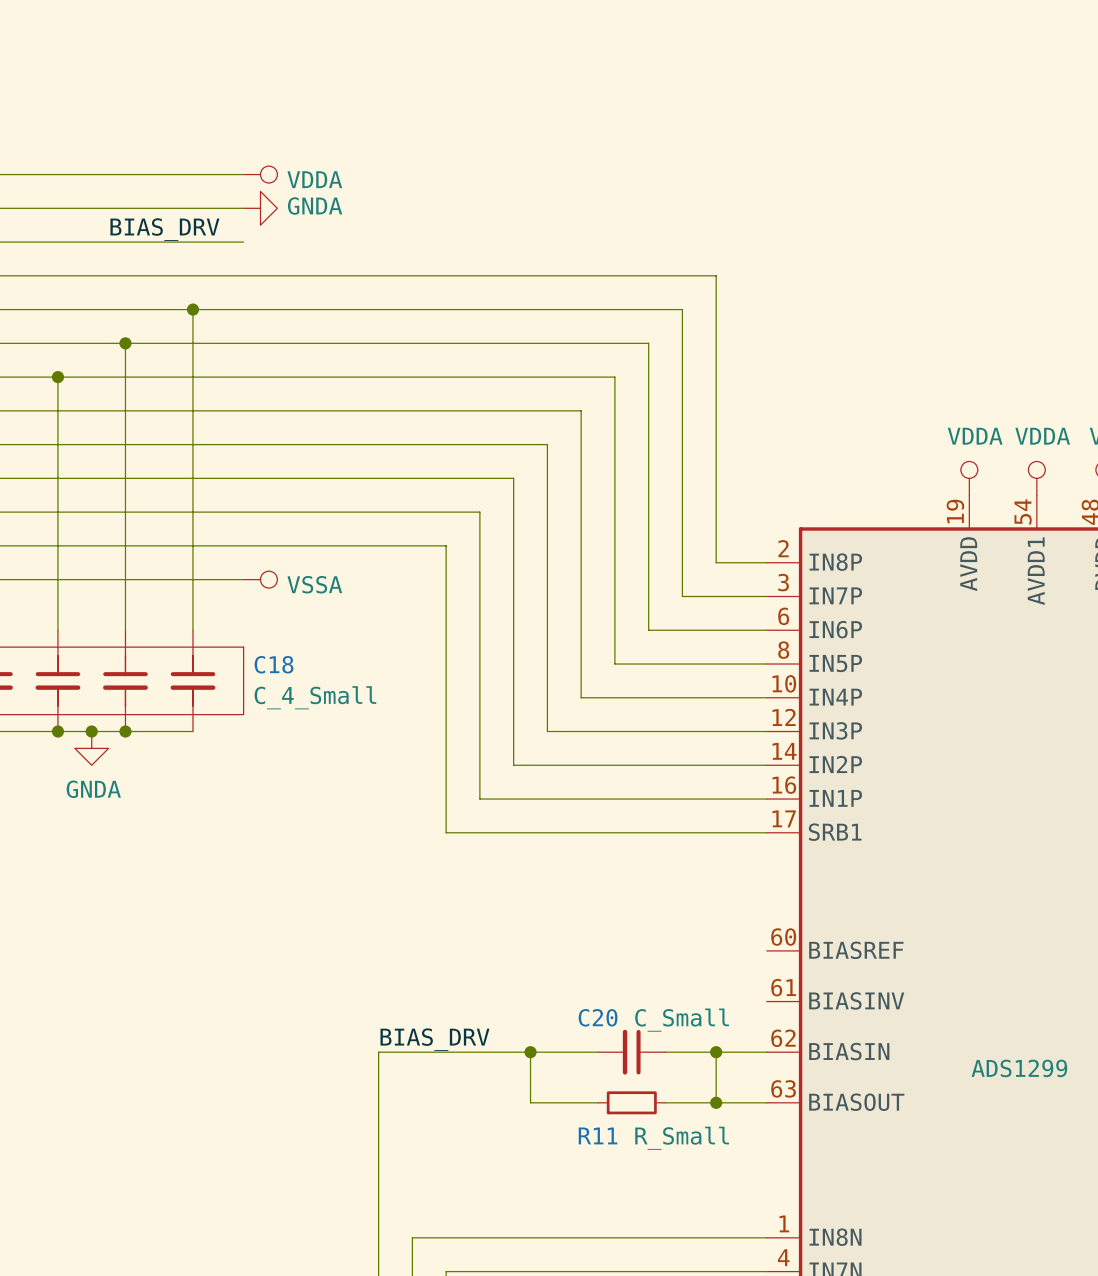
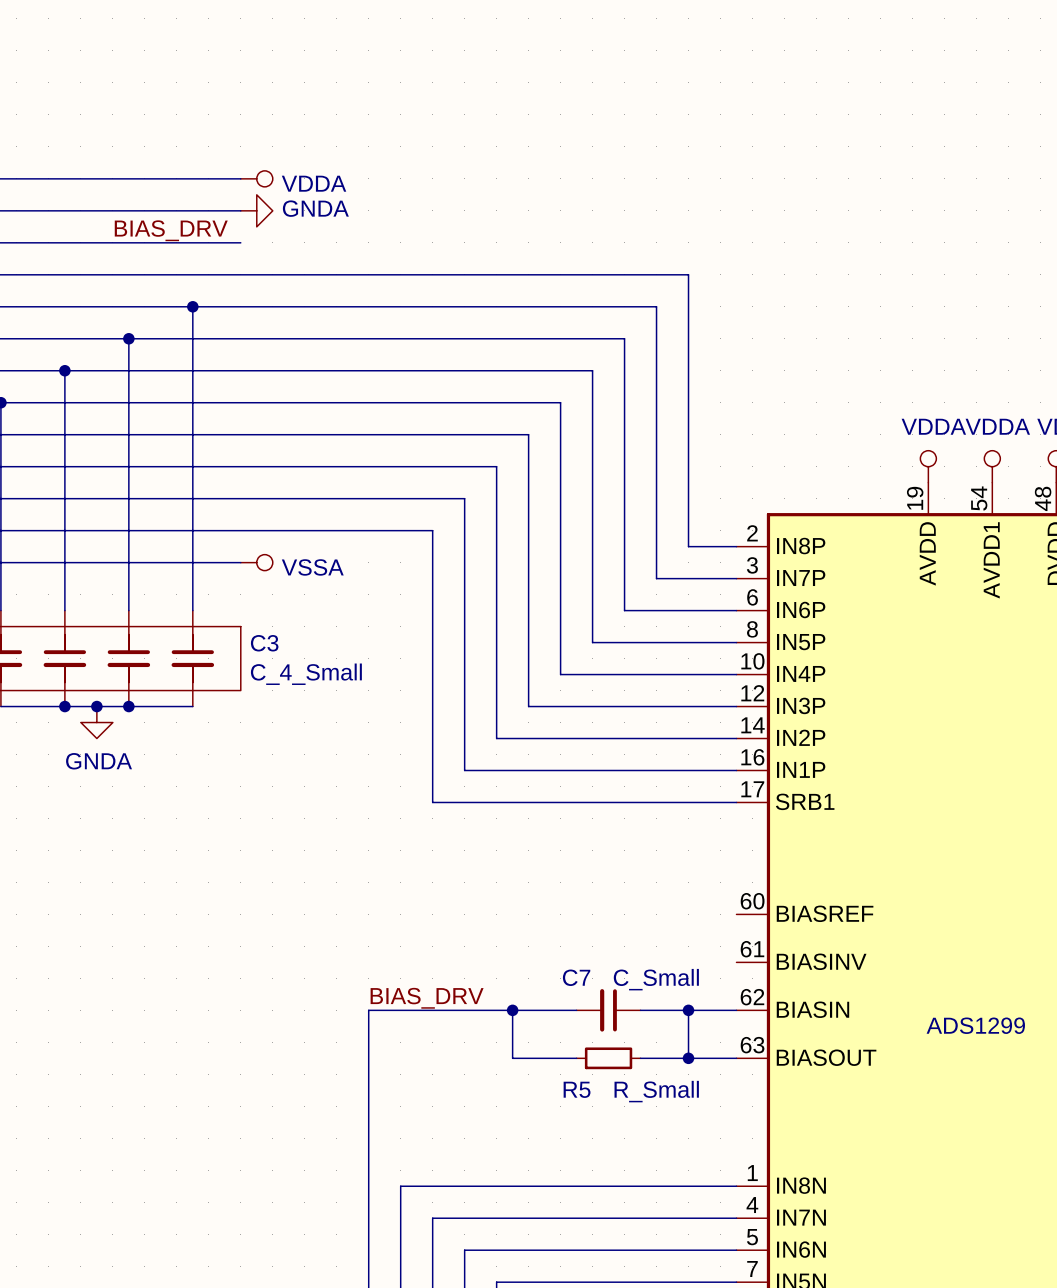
C18 name: C18 (274, 664) -> C3 (264, 643)
C20 name: C20 (598, 1017) -> C7 (576, 977)
R11 name: R11 (598, 1135) -> R5 (577, 1089)

